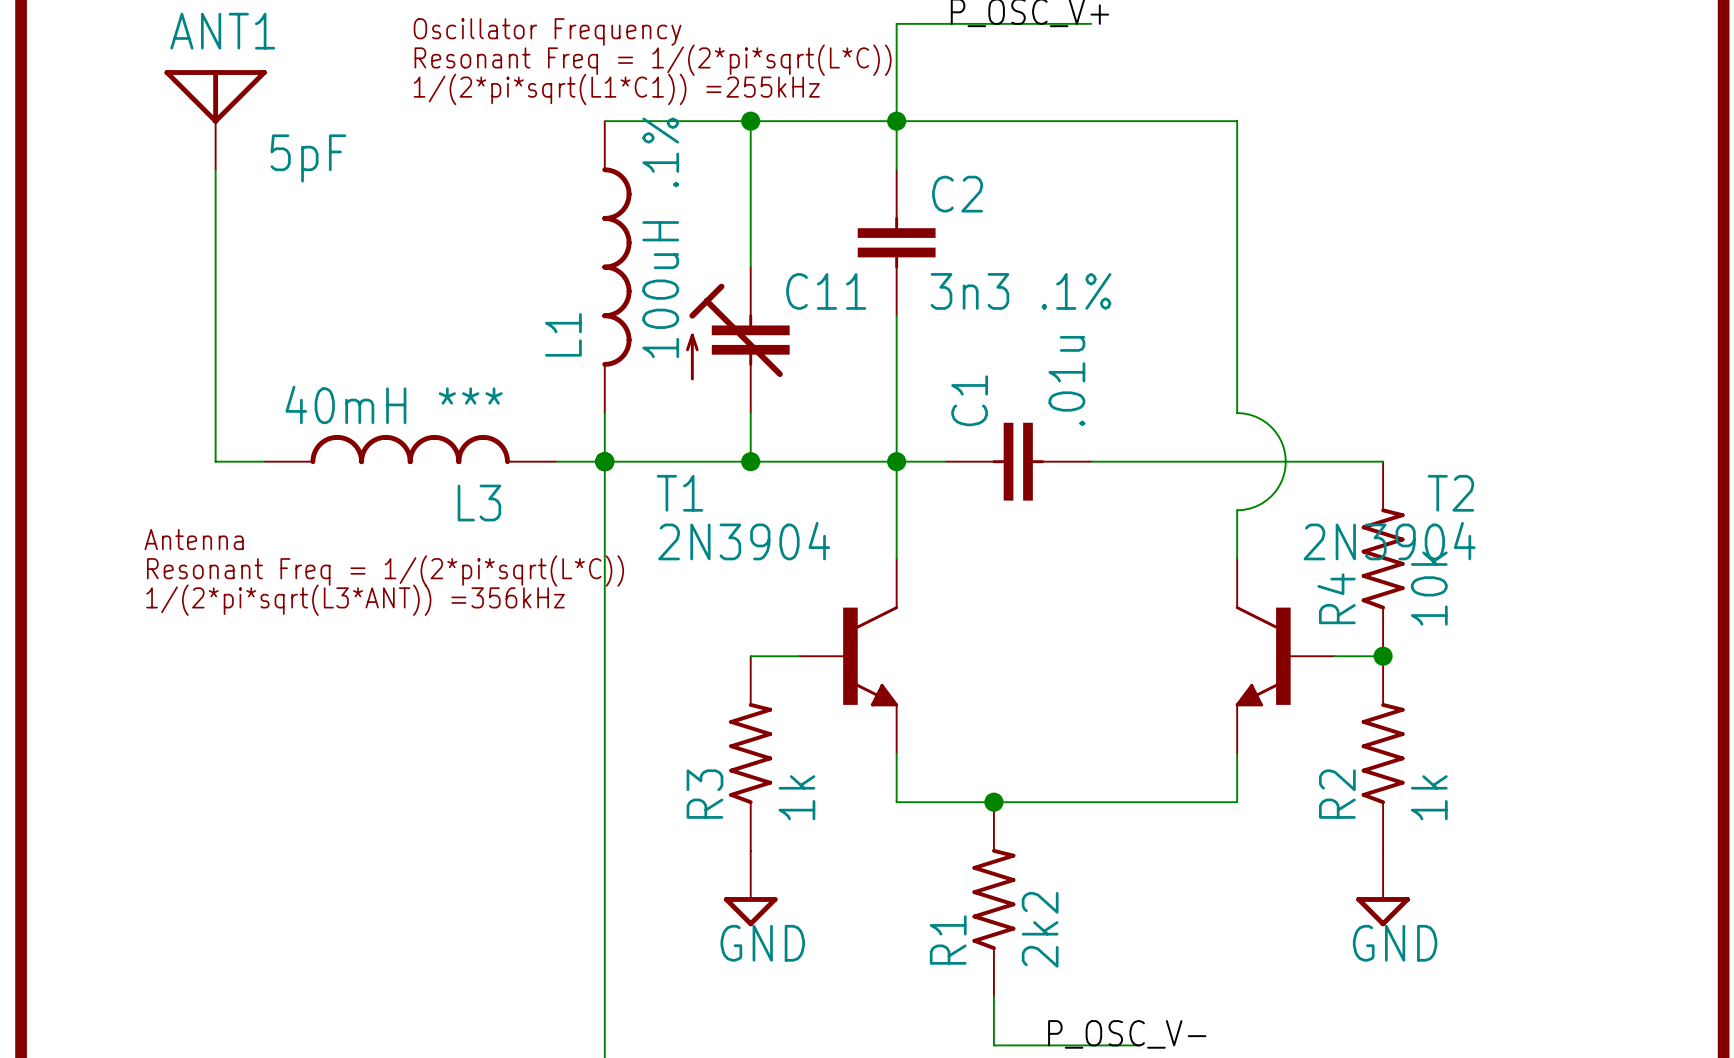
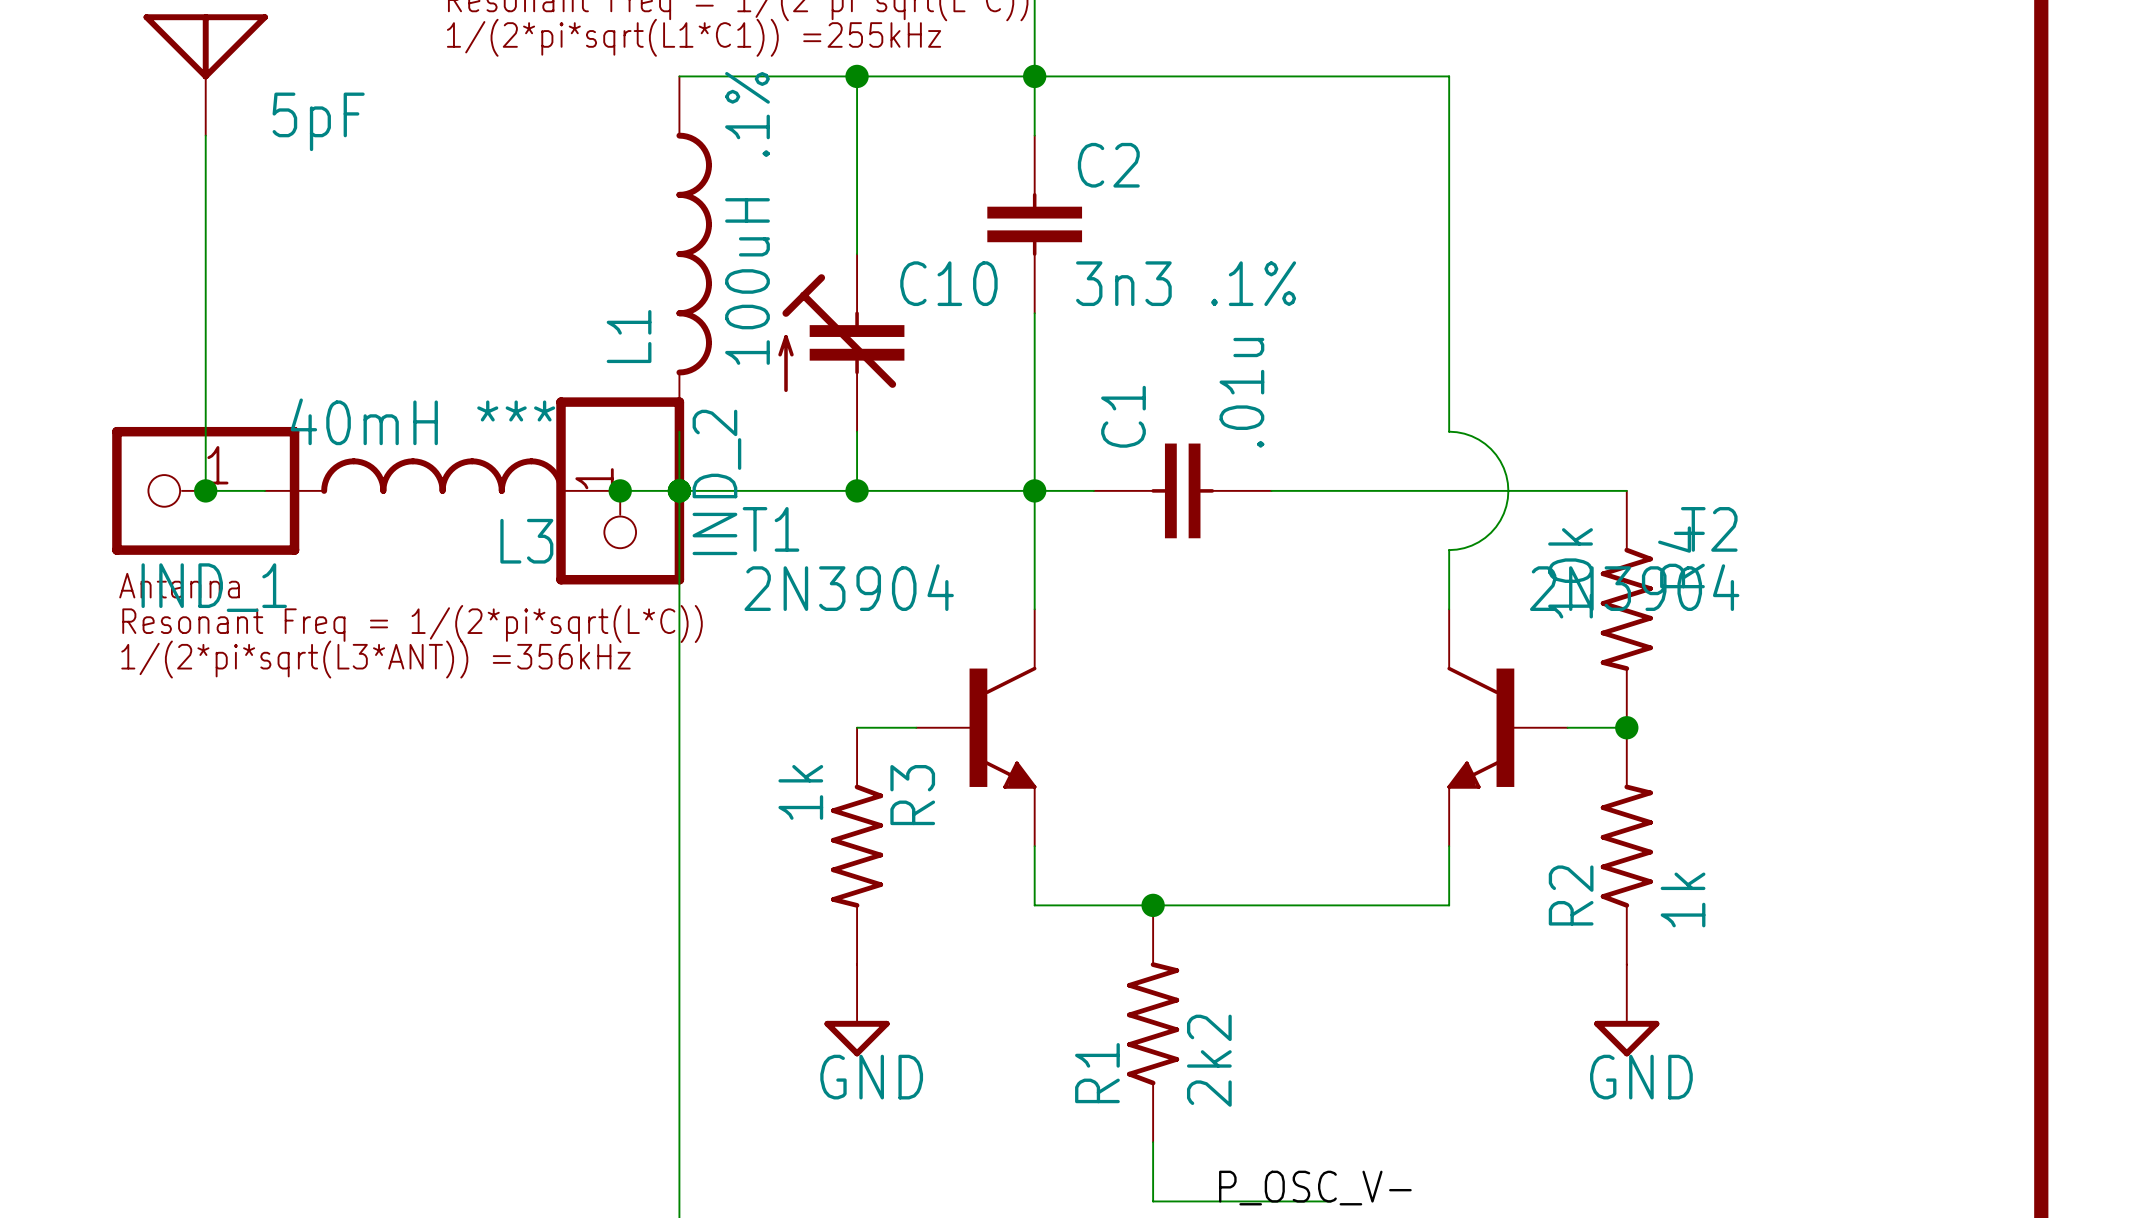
C11 name: C11 (826, 291) -> C10 (948, 283)
IND_1: none -> (205, 490)
junction: none -> (205, 490)
IND_2: none -> (620, 490)
junction: none -> (620, 490)
R4 rotation: 0° (1383, 558) -> 180° (1626, 609)
R3 rotation: 0° (750, 753) -> 180° (857, 846)

